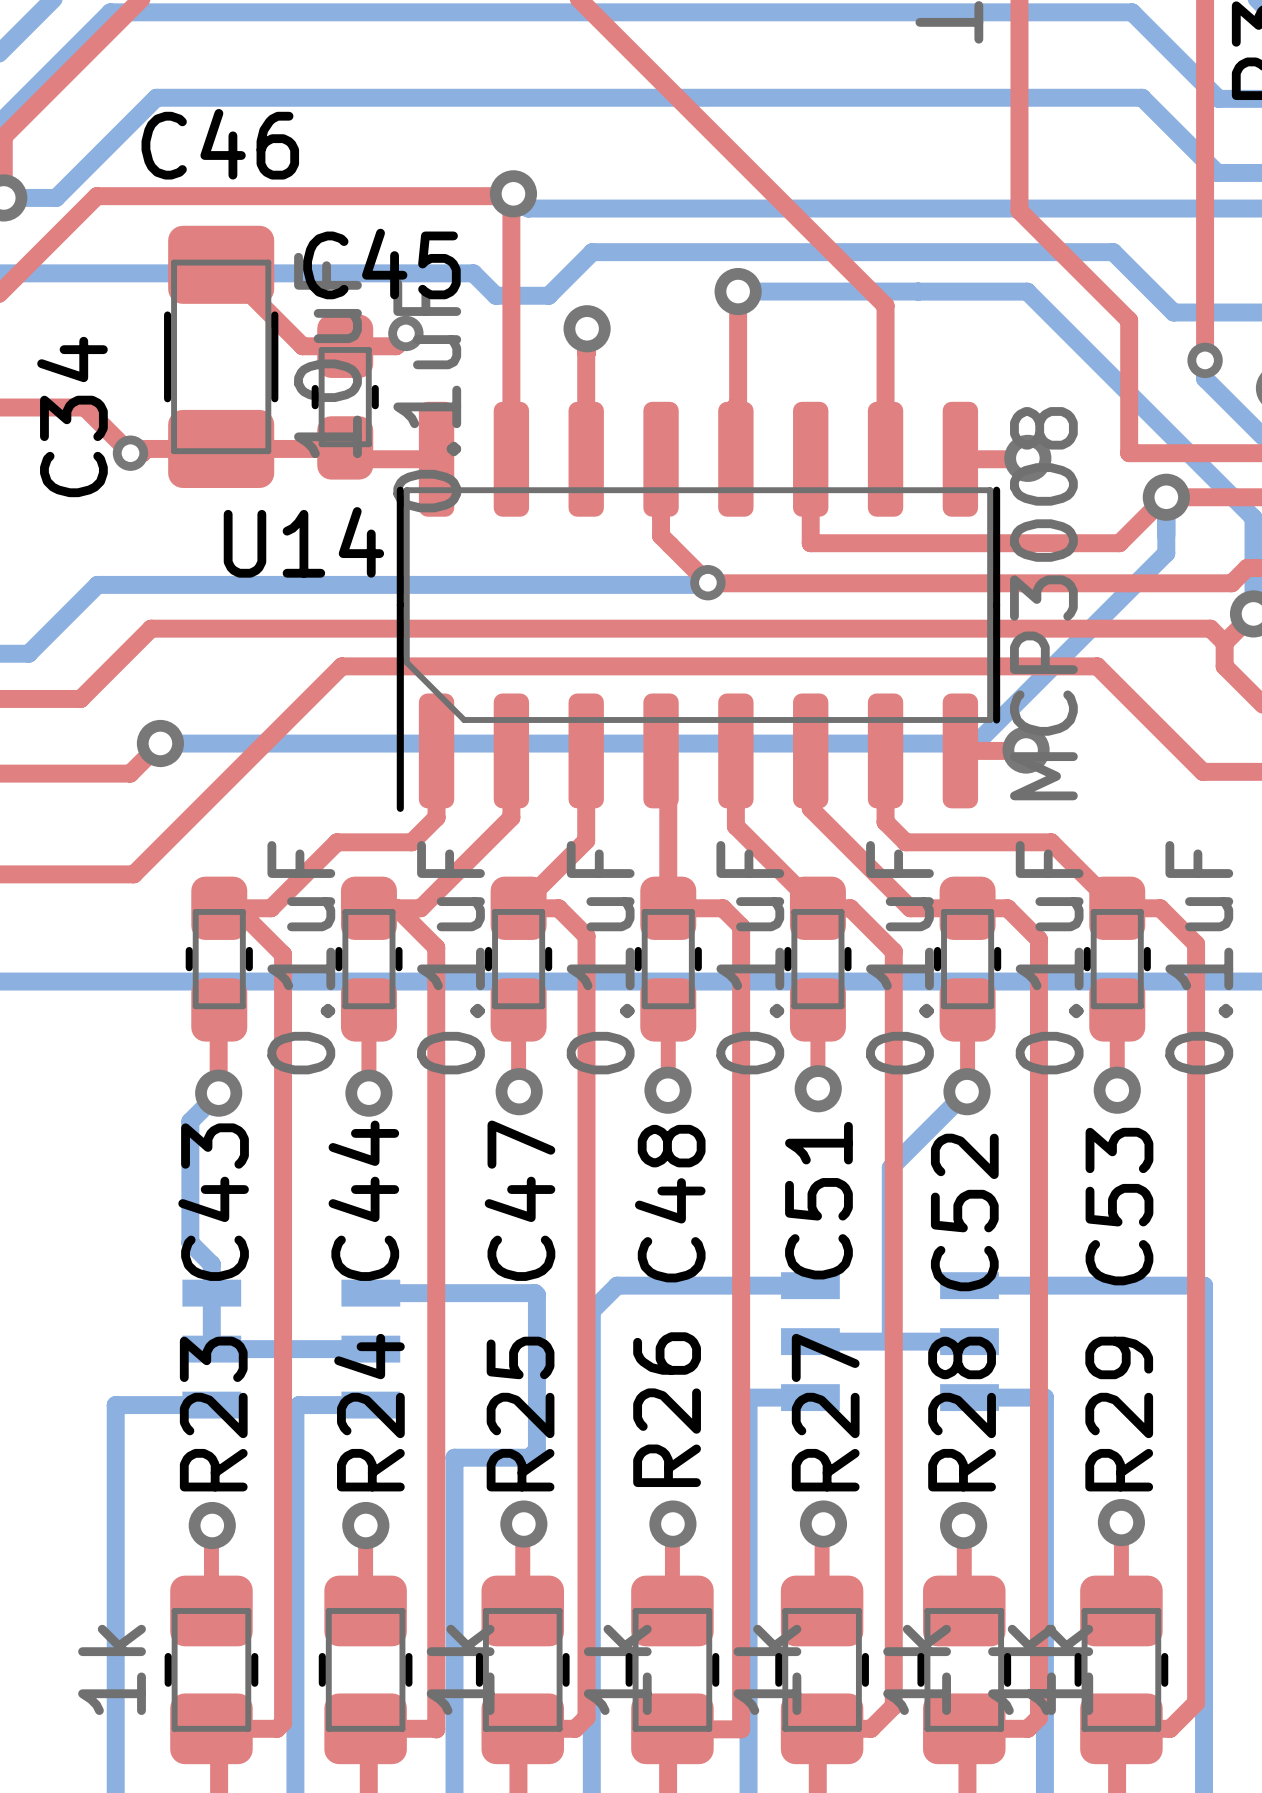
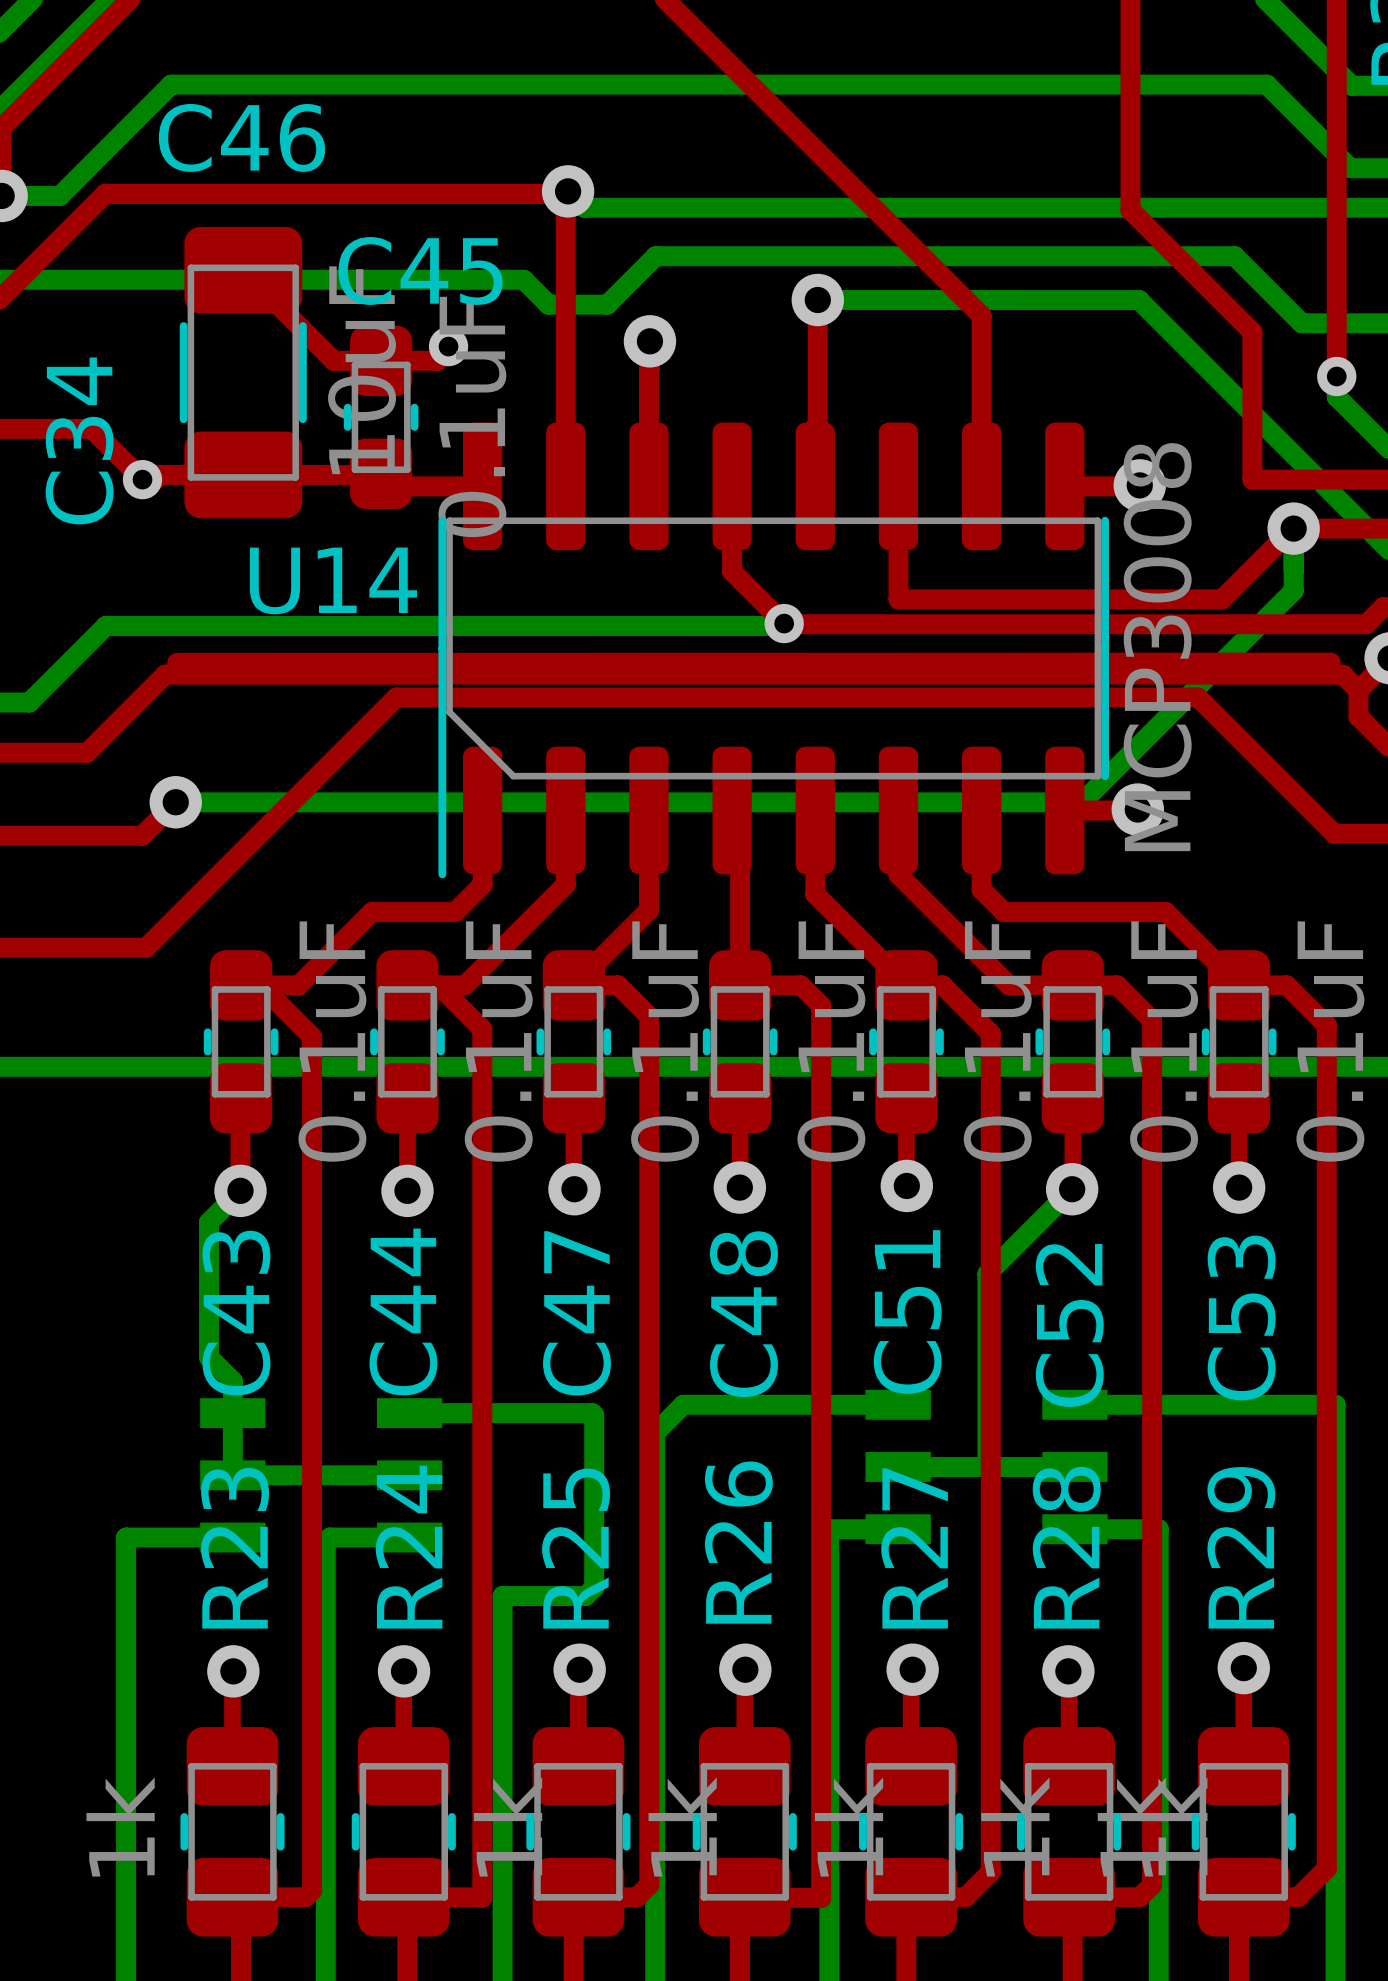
top track: (810, 543) (1119, 543) -> (898, 579) (898, 599) (1221, 599) (1241, 579)
top track: none -> (177, 662) (1330, 662)
top track: (341, 666) (1097, 666) -> (377, 716) (396, 697) (1198, 697) (1217, 716)

